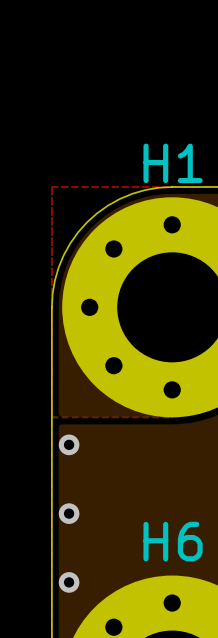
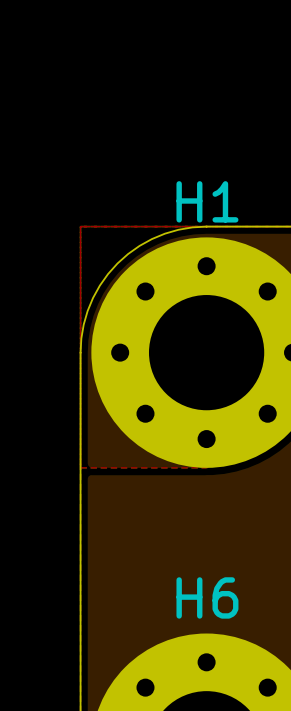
via: (69, 444) -> none
via: (69, 513) -> none
via: (69, 582) -> none

